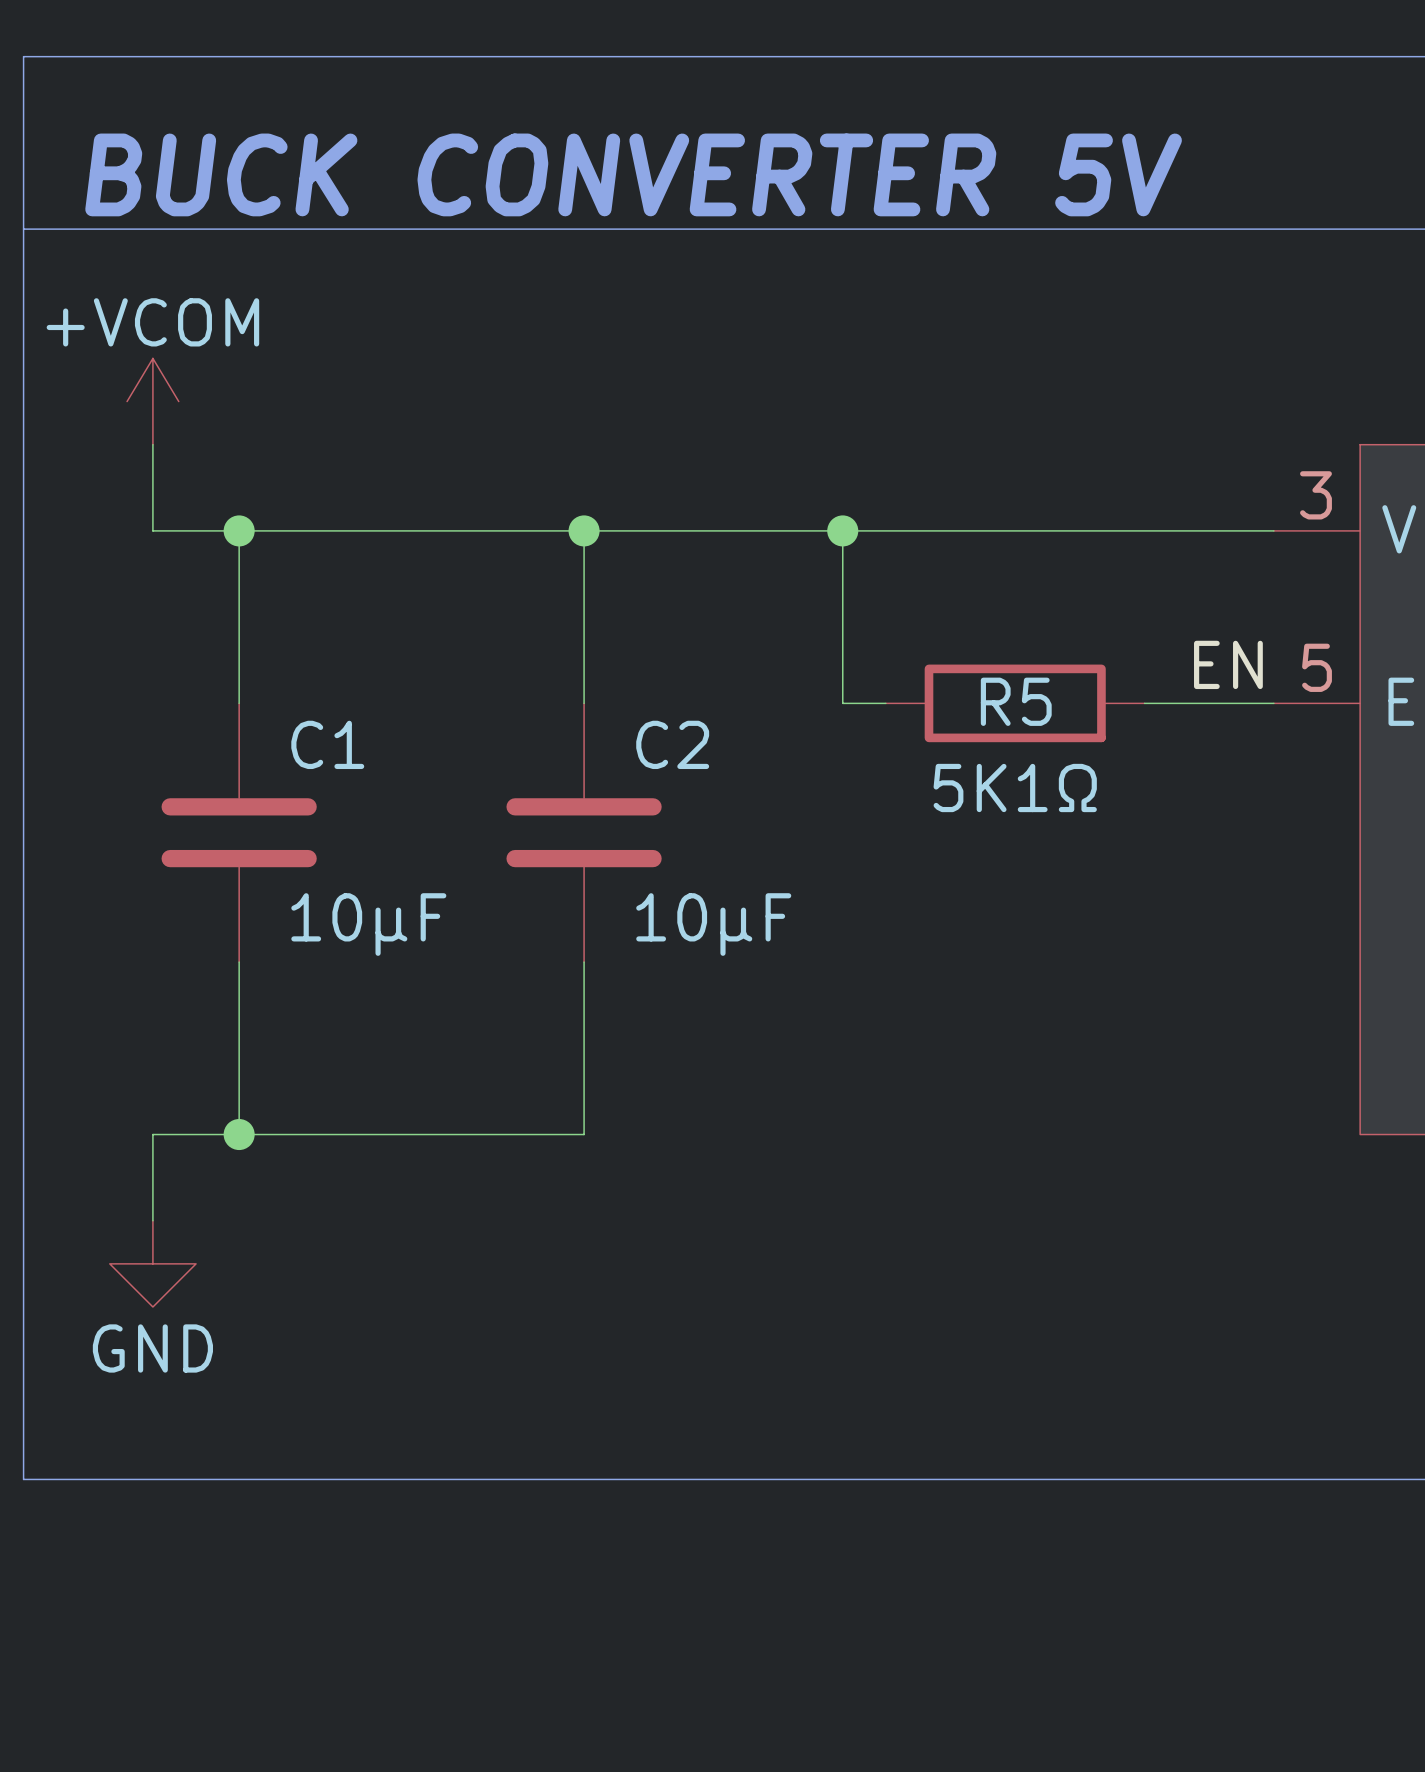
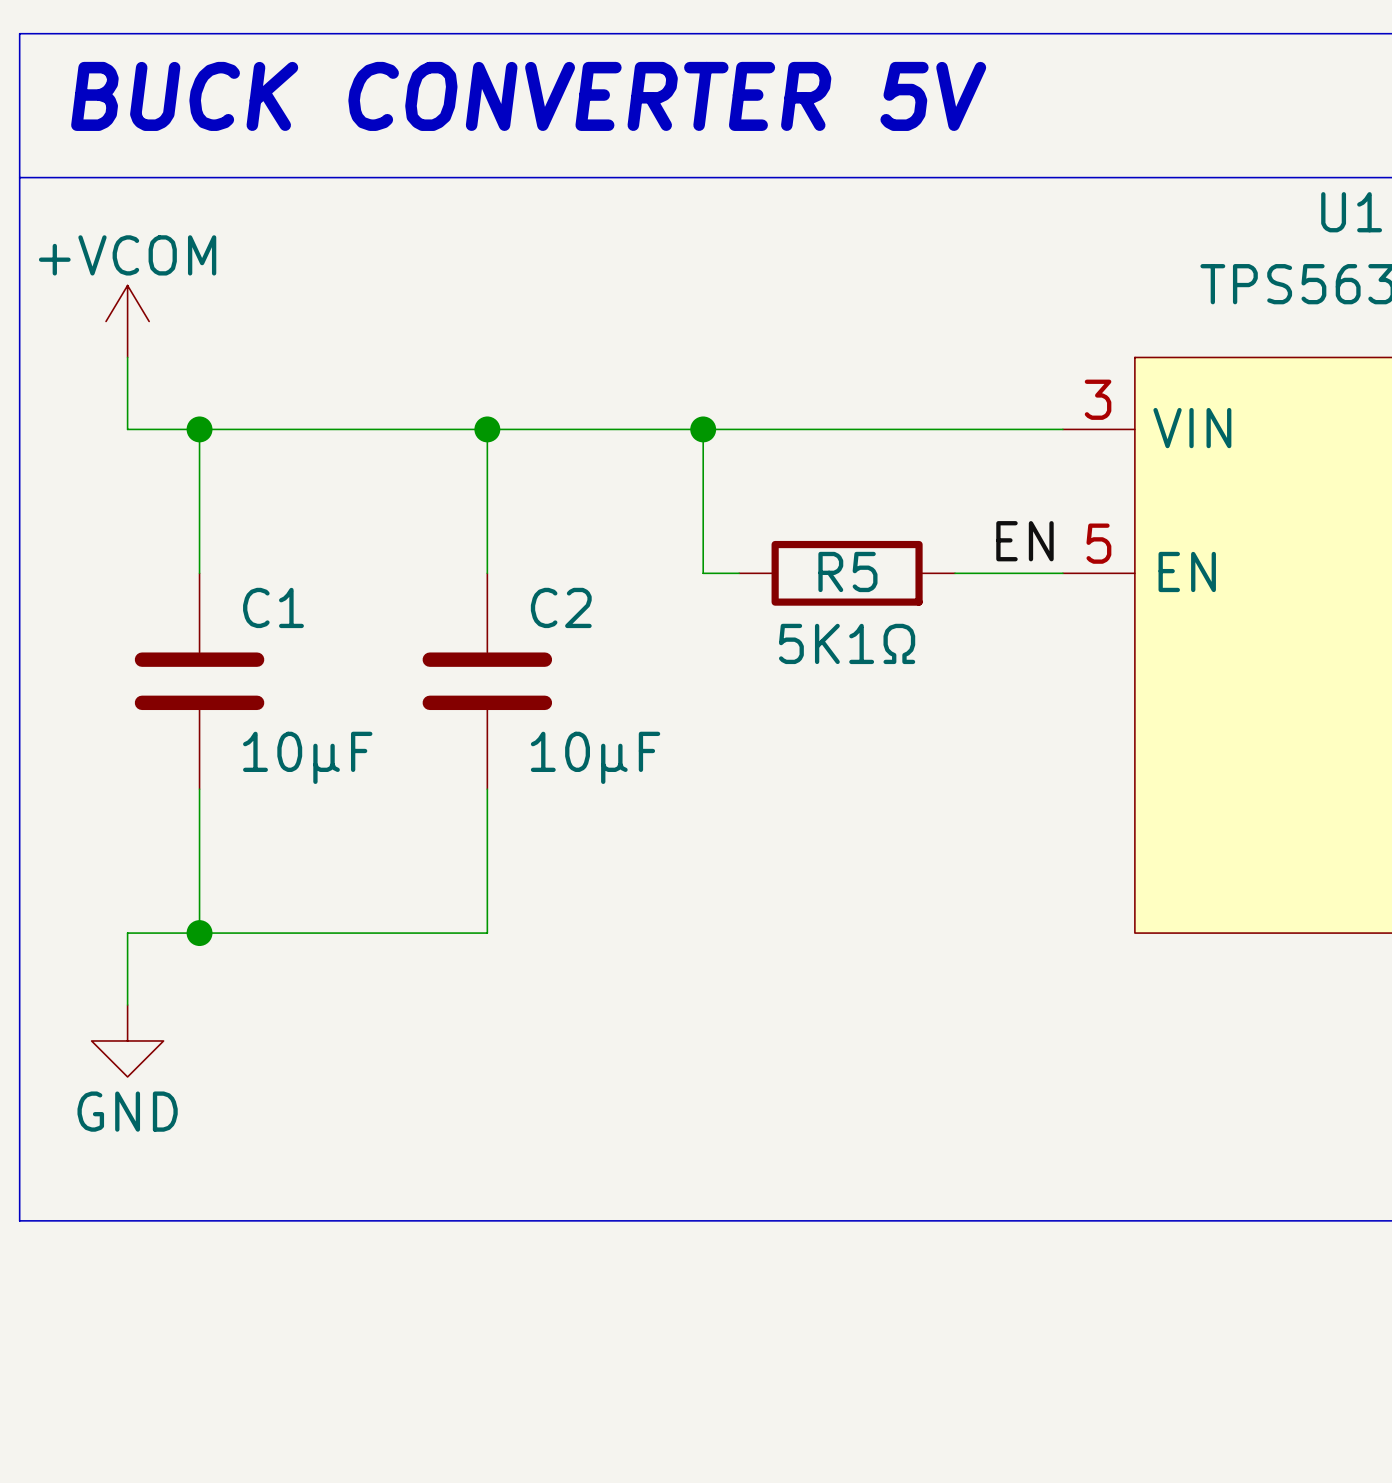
text position: BUCK CONVERTER 5V (633, 174) -> BUCK CONVERTER 5V (528, 96)

